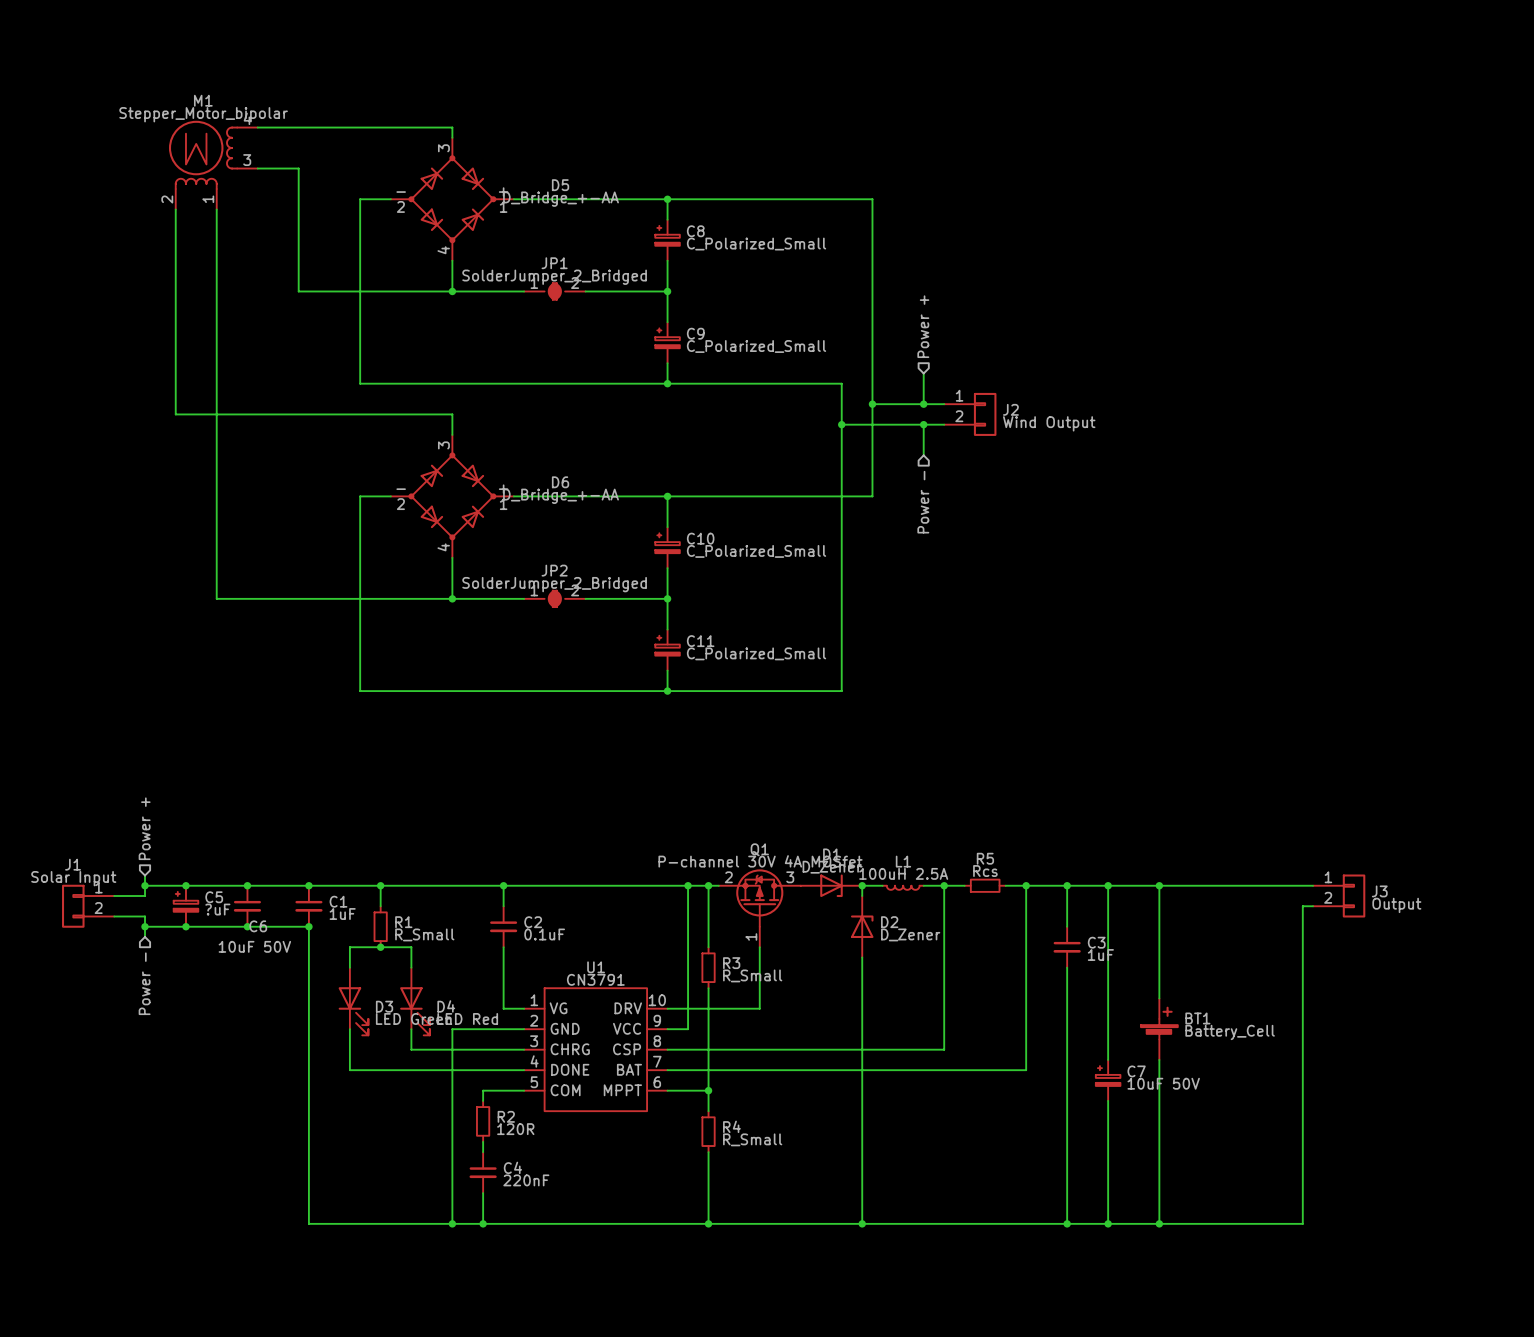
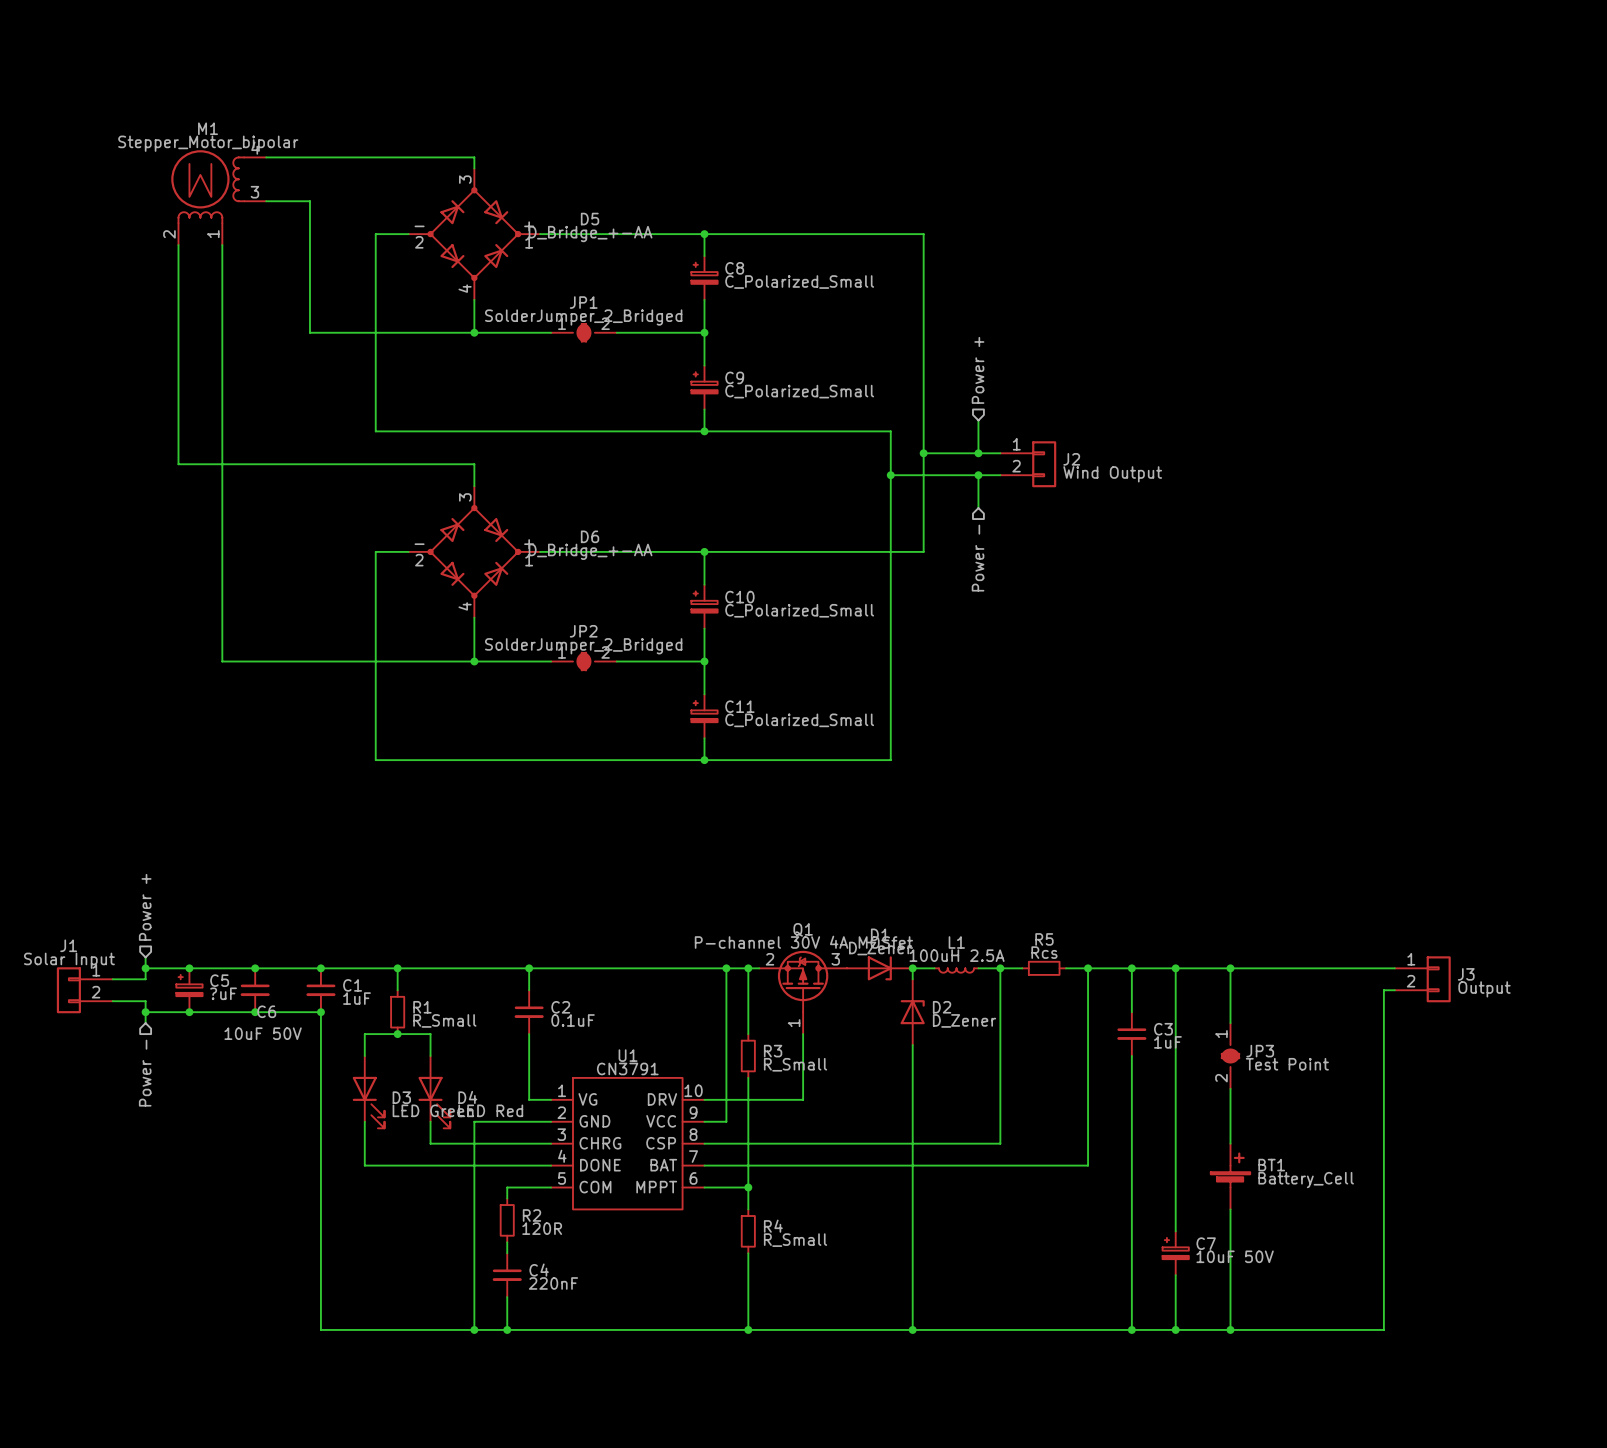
JP3: none -> Test Point (1230, 1056)
BT1 position: (1159, 1029) -> (1230, 1176)
C7 position: (1108, 1080) -> (1175, 1253)

